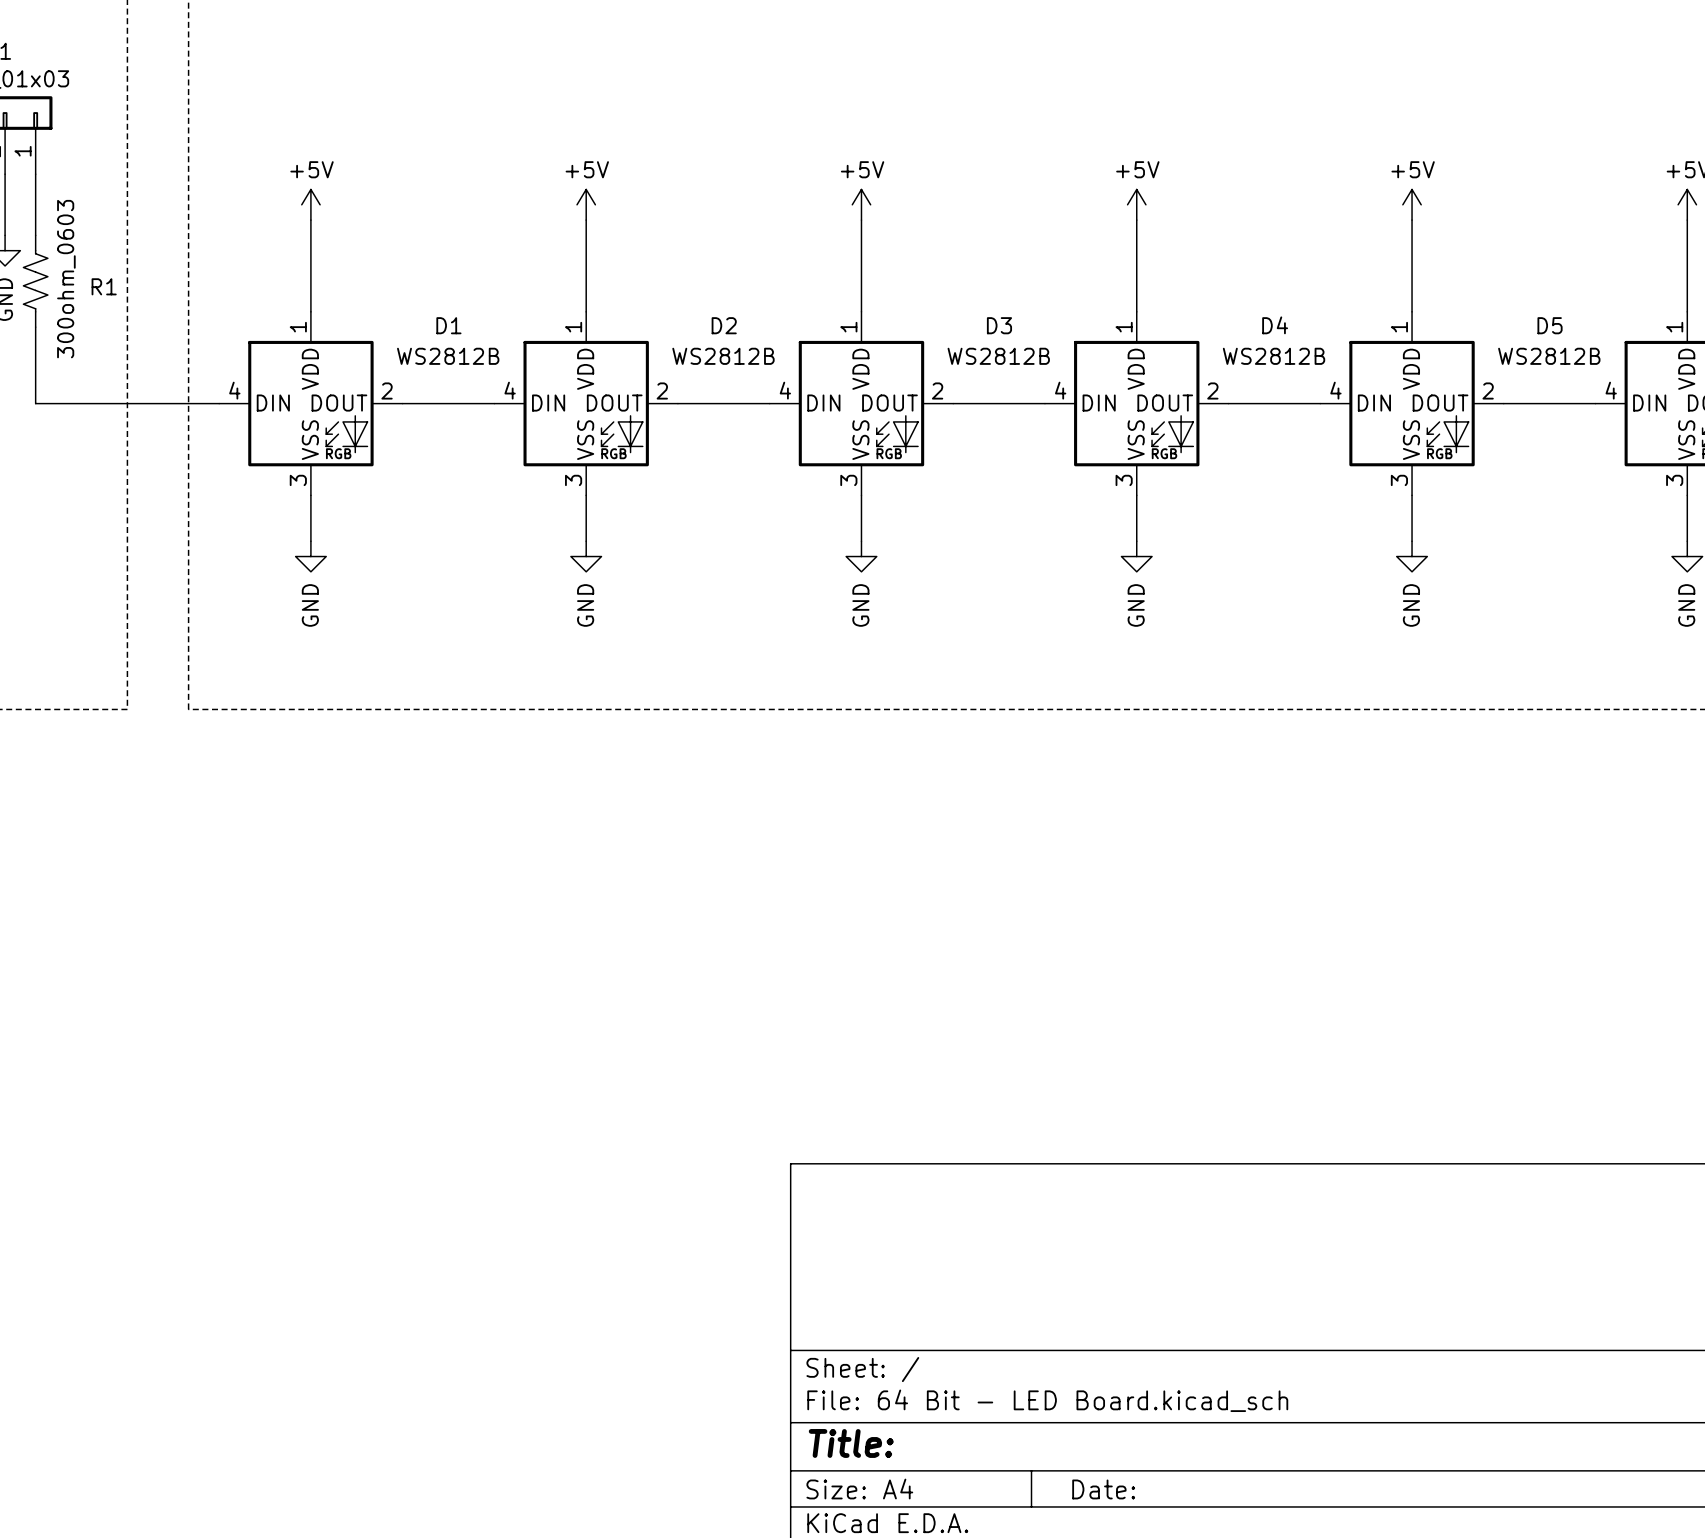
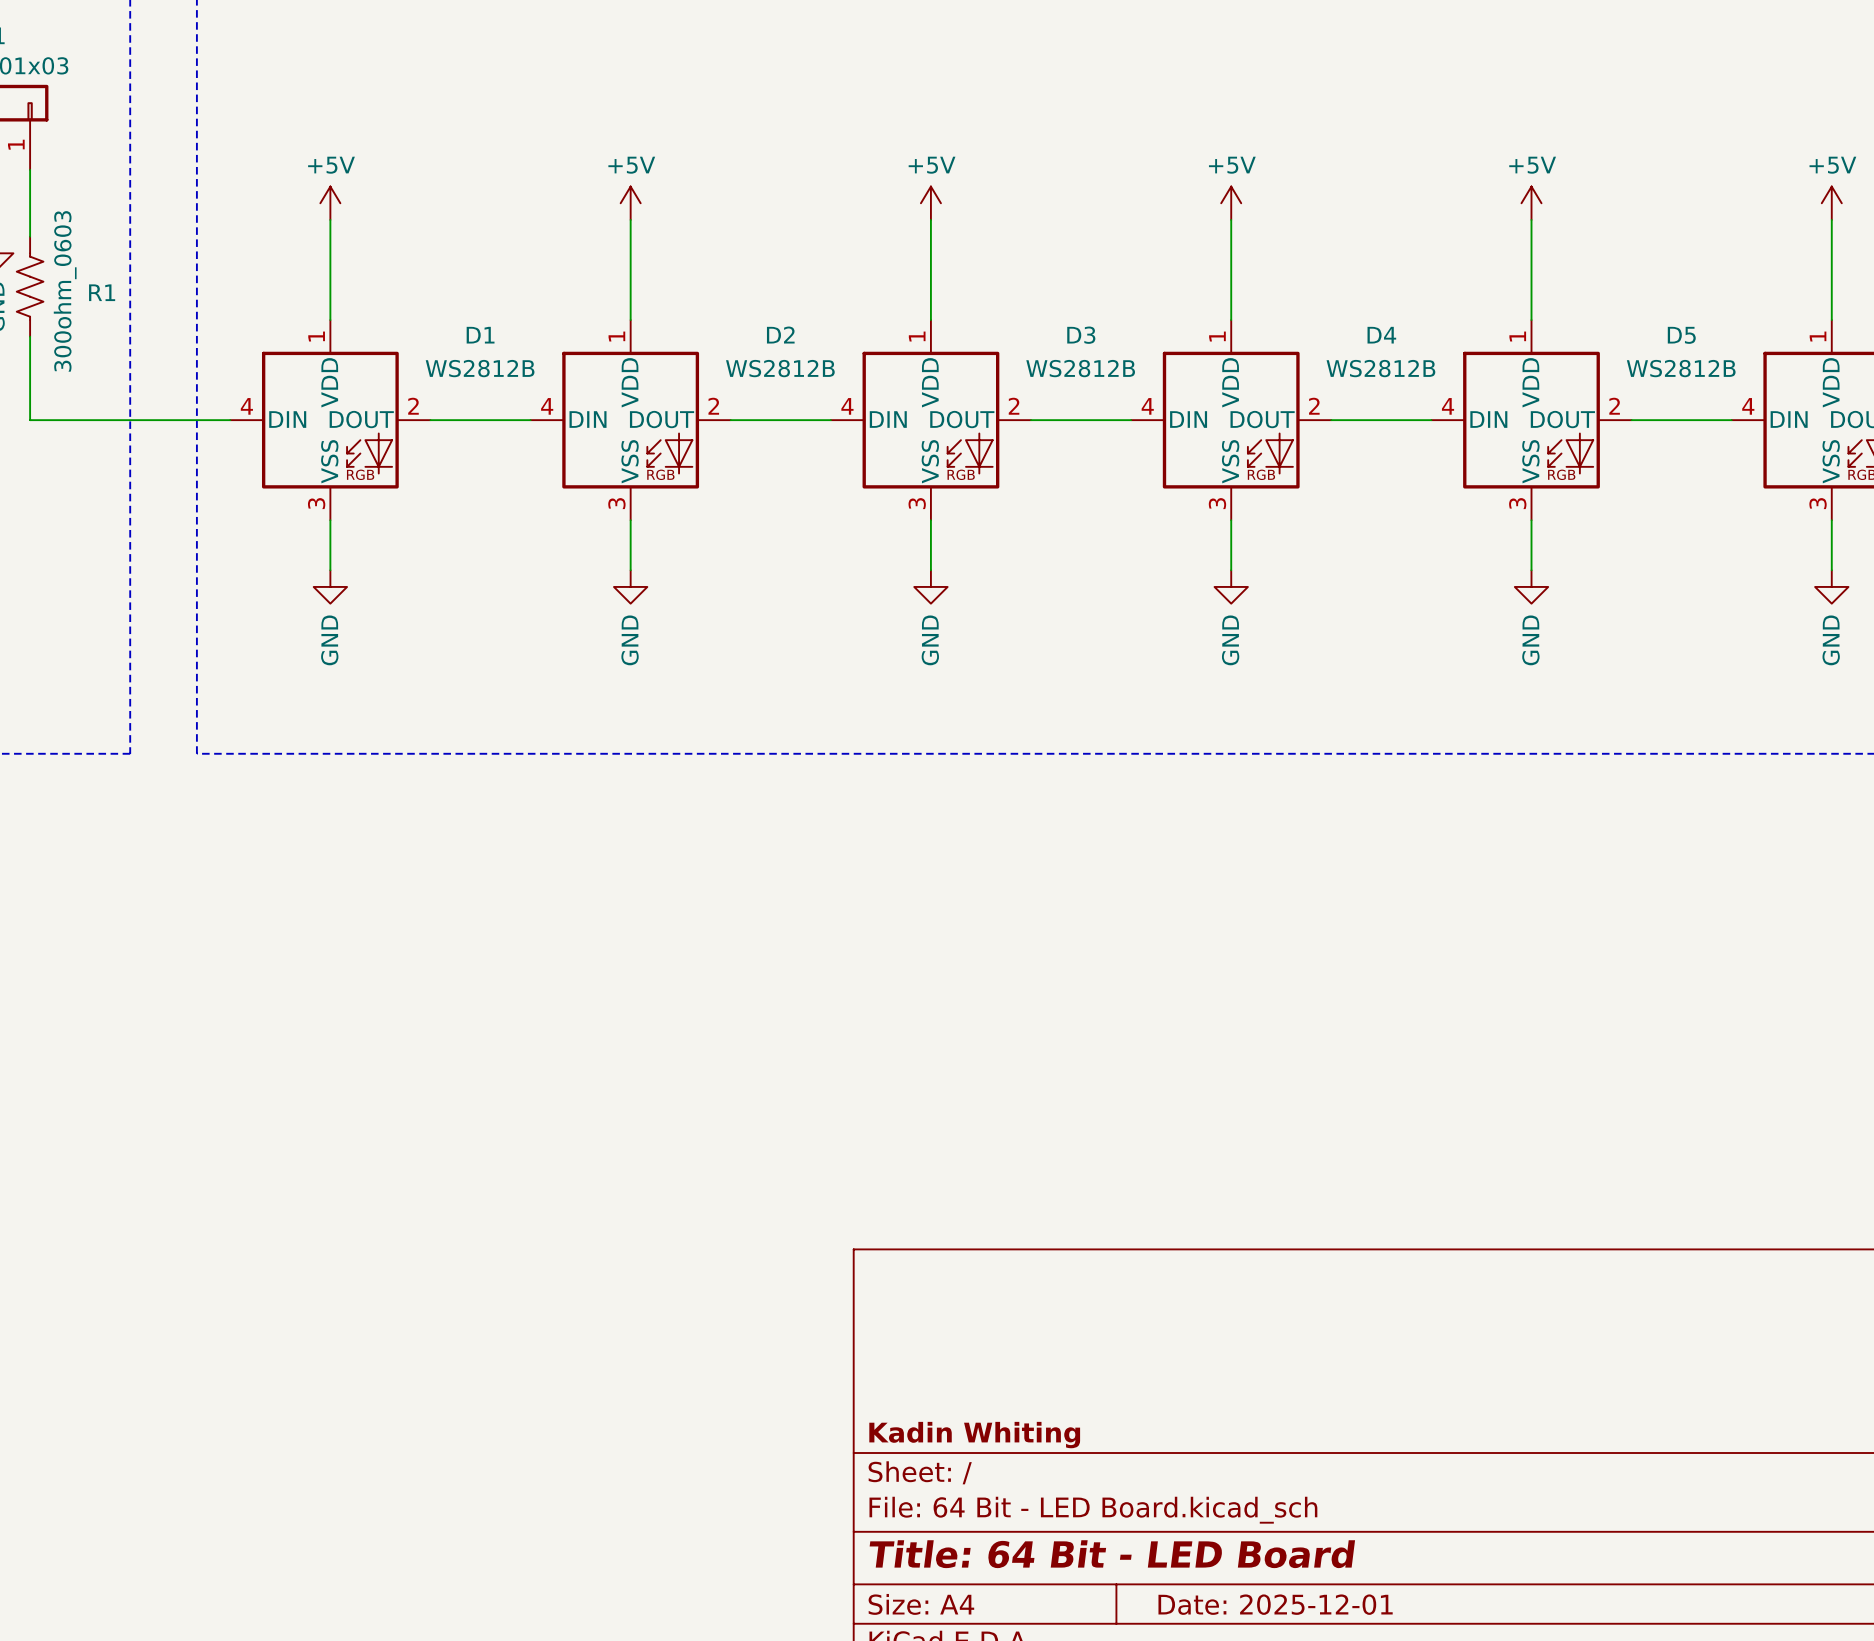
title block: none -> Kadin Whiting (974, 1435)
title block: Title: (851, 1443) -> Title: 64 Bit - LED Board (1112, 1554)
title block: Date: (1103, 1489) -> Date: 2025-12-01 (1275, 1604)

